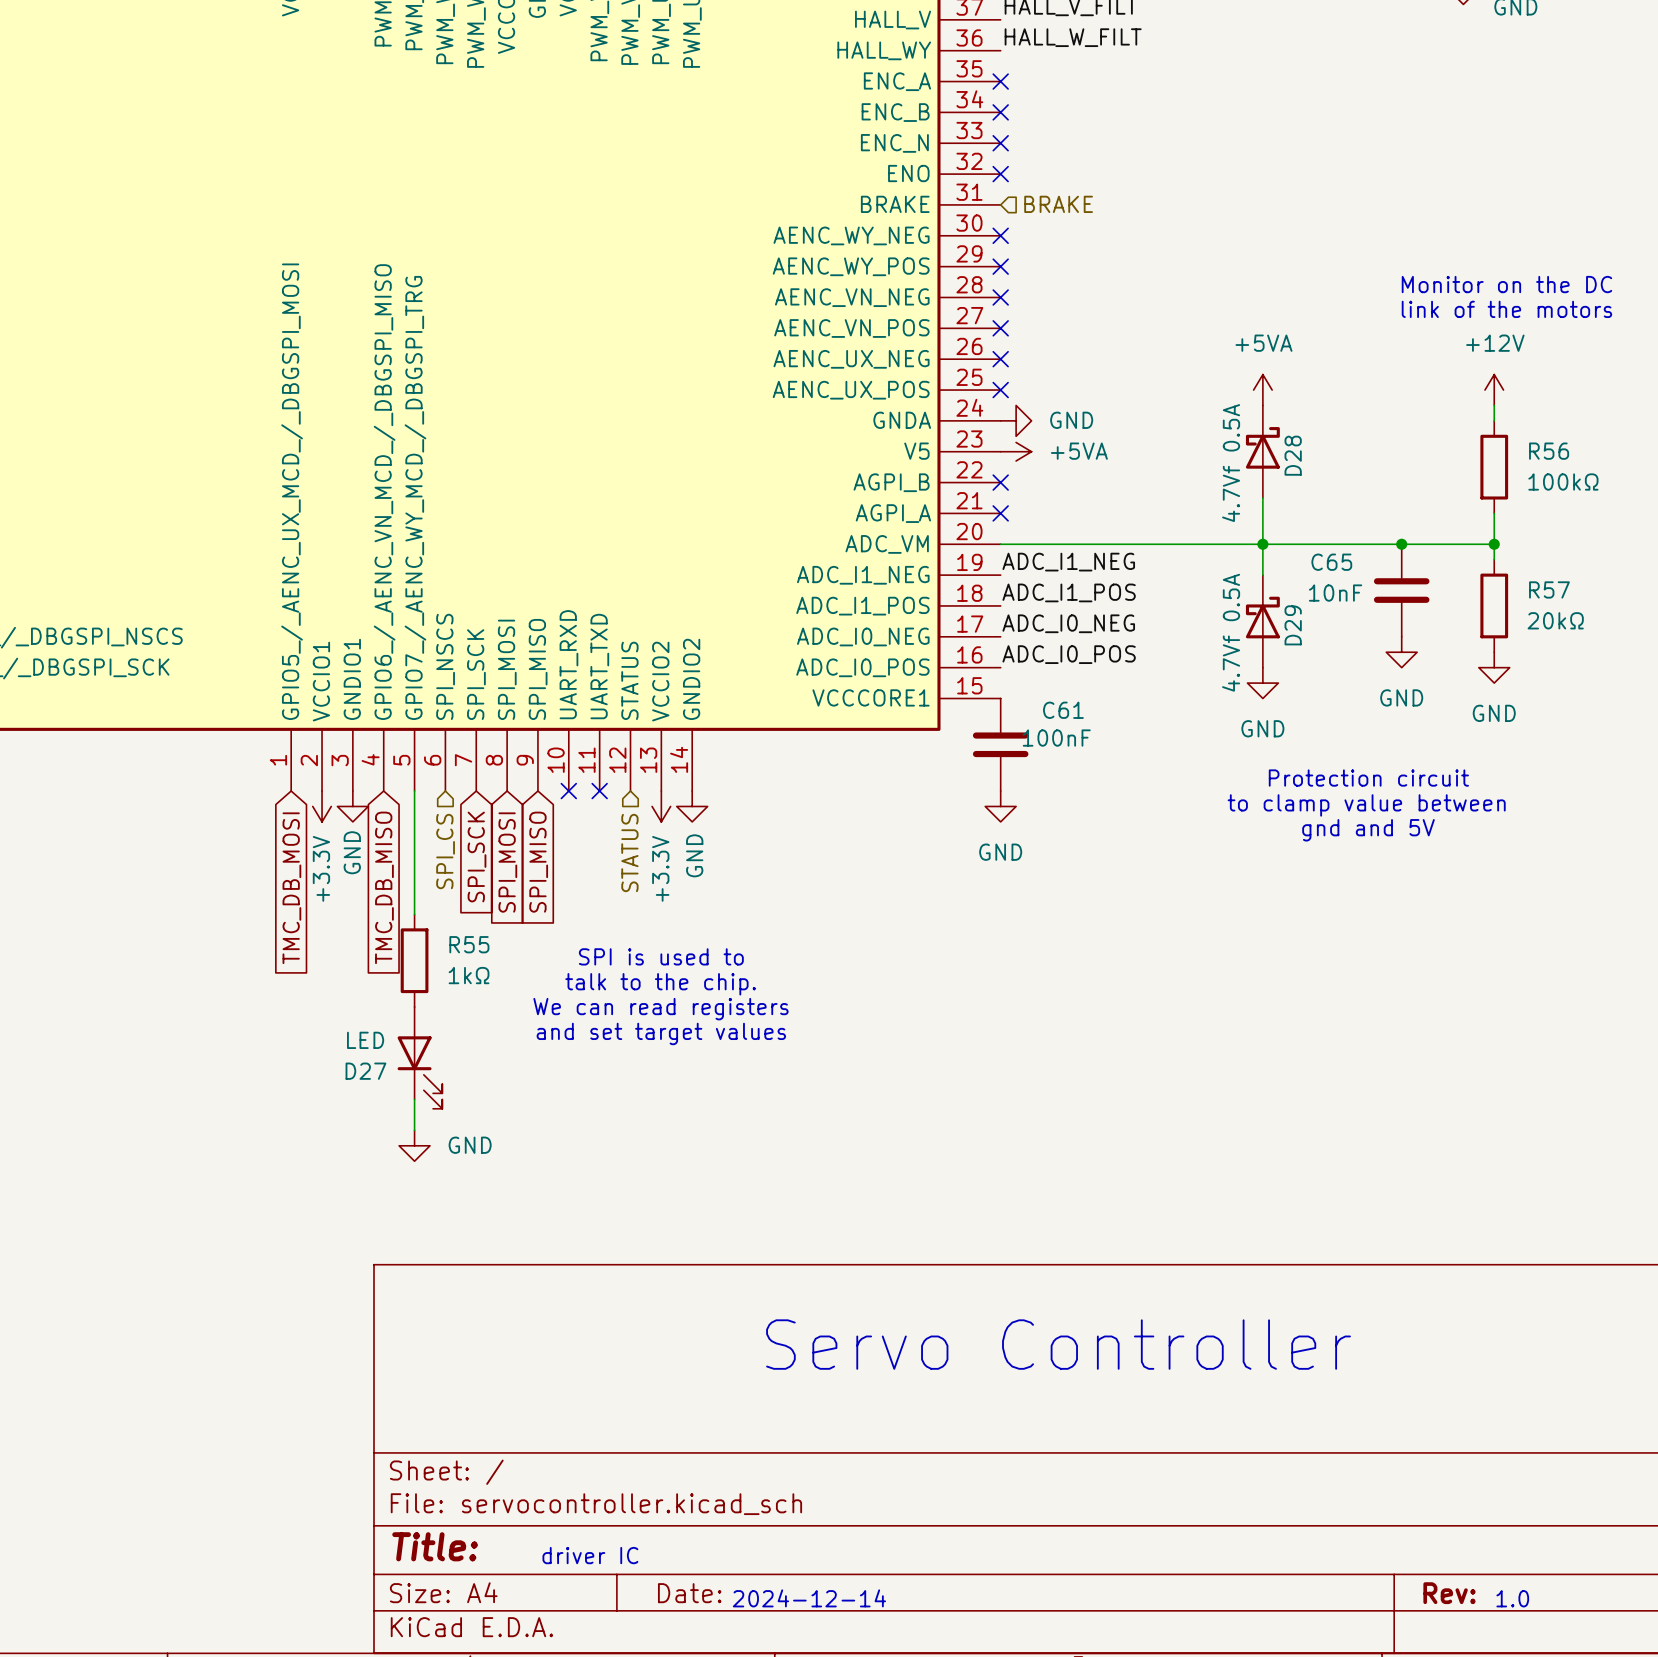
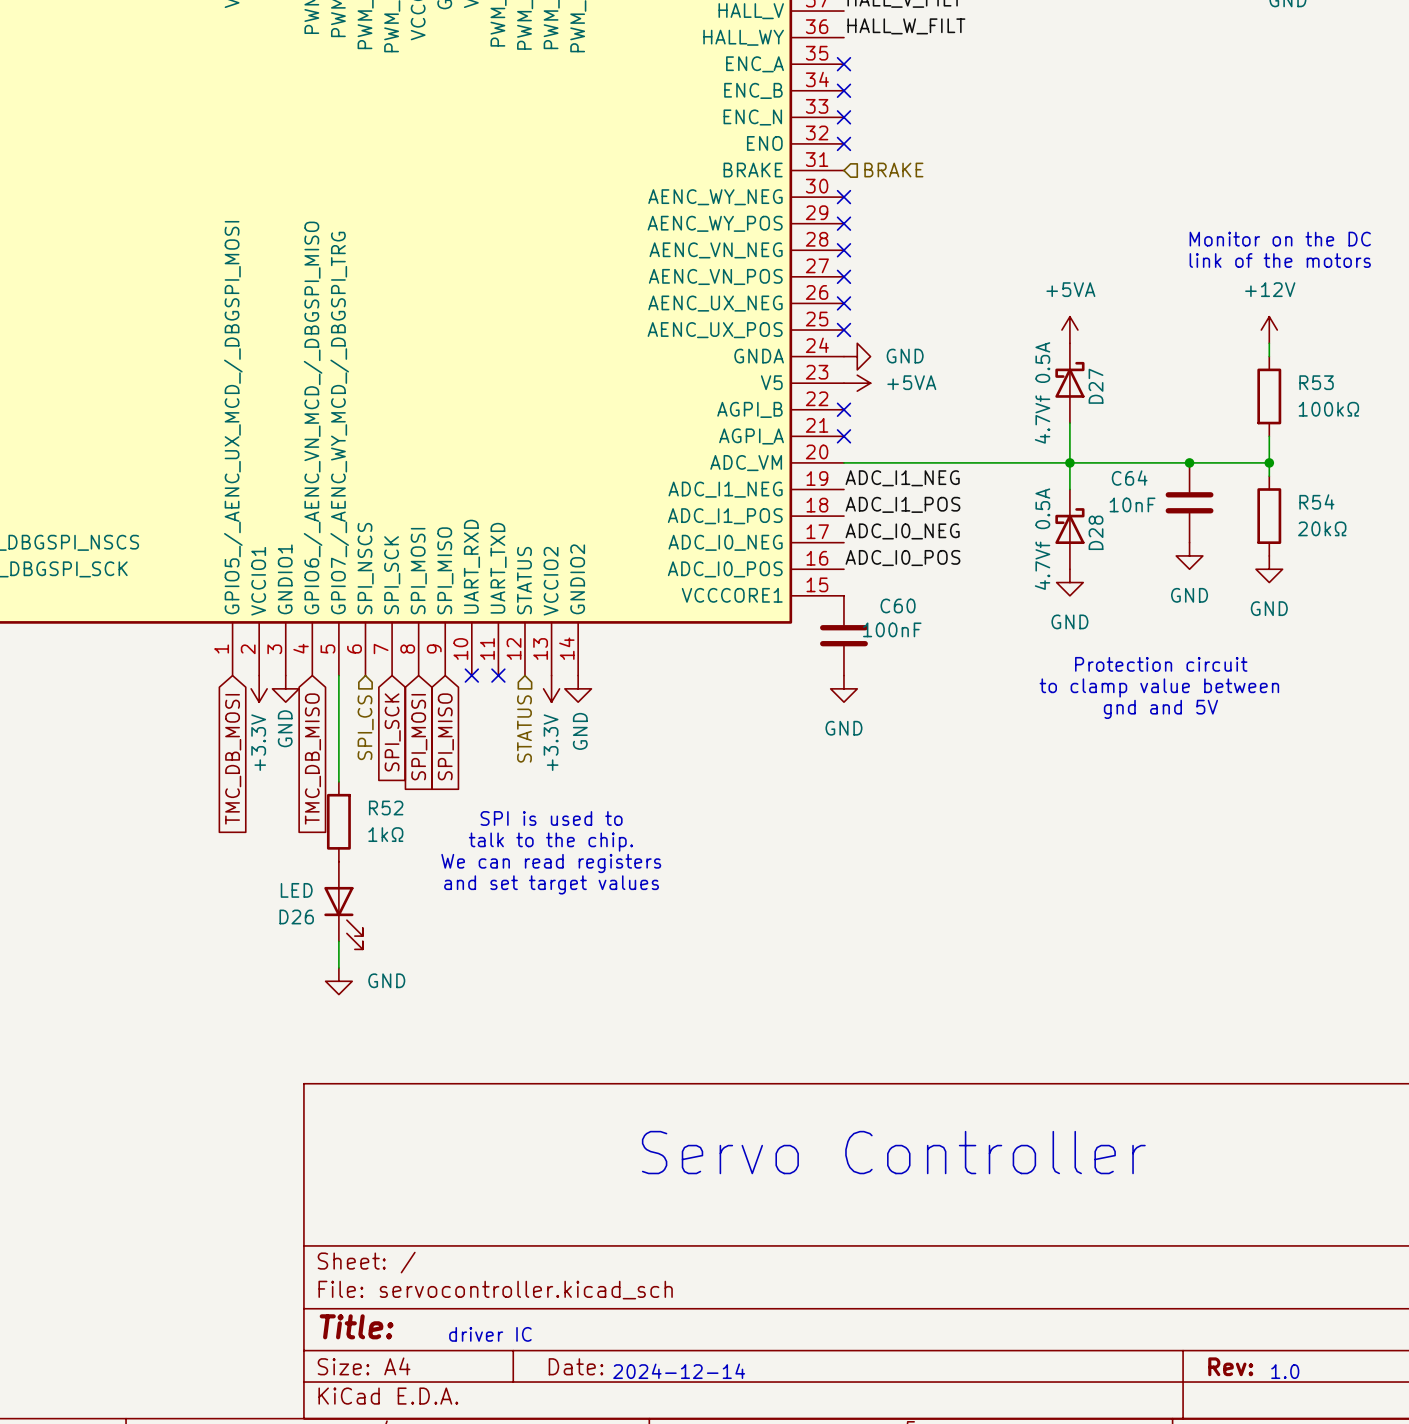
R56 name: R56 (1549, 451) -> R53 (1316, 382)
D28 name: D28 (1293, 455) -> D27 (1096, 386)
C65 name: C65 (1331, 562) -> C64 (1129, 478)
R57 name: R57 (1549, 589) -> R54 (1316, 501)
D29 name: D29 (1293, 625) -> D28 (1096, 532)
C61 name: C61 (1063, 710) -> C60 (898, 605)
R55 name: R55 (469, 944) -> R52 (386, 808)
D27 name: D27 (365, 1071) -> D26 (296, 916)

